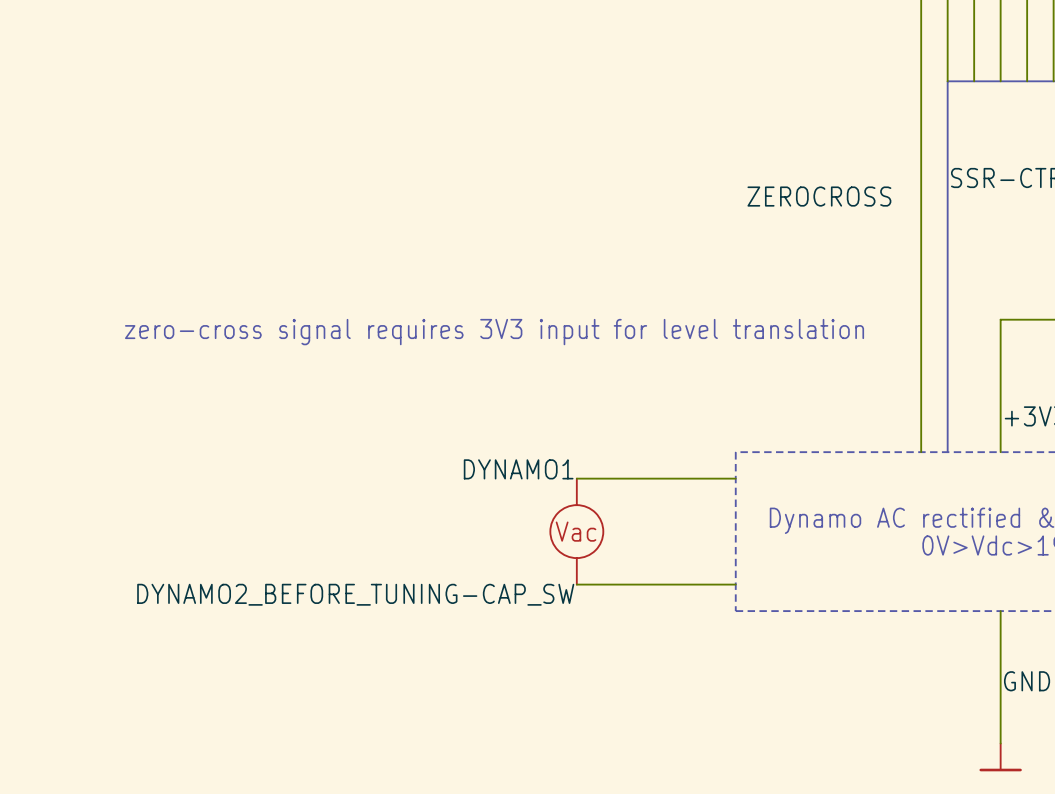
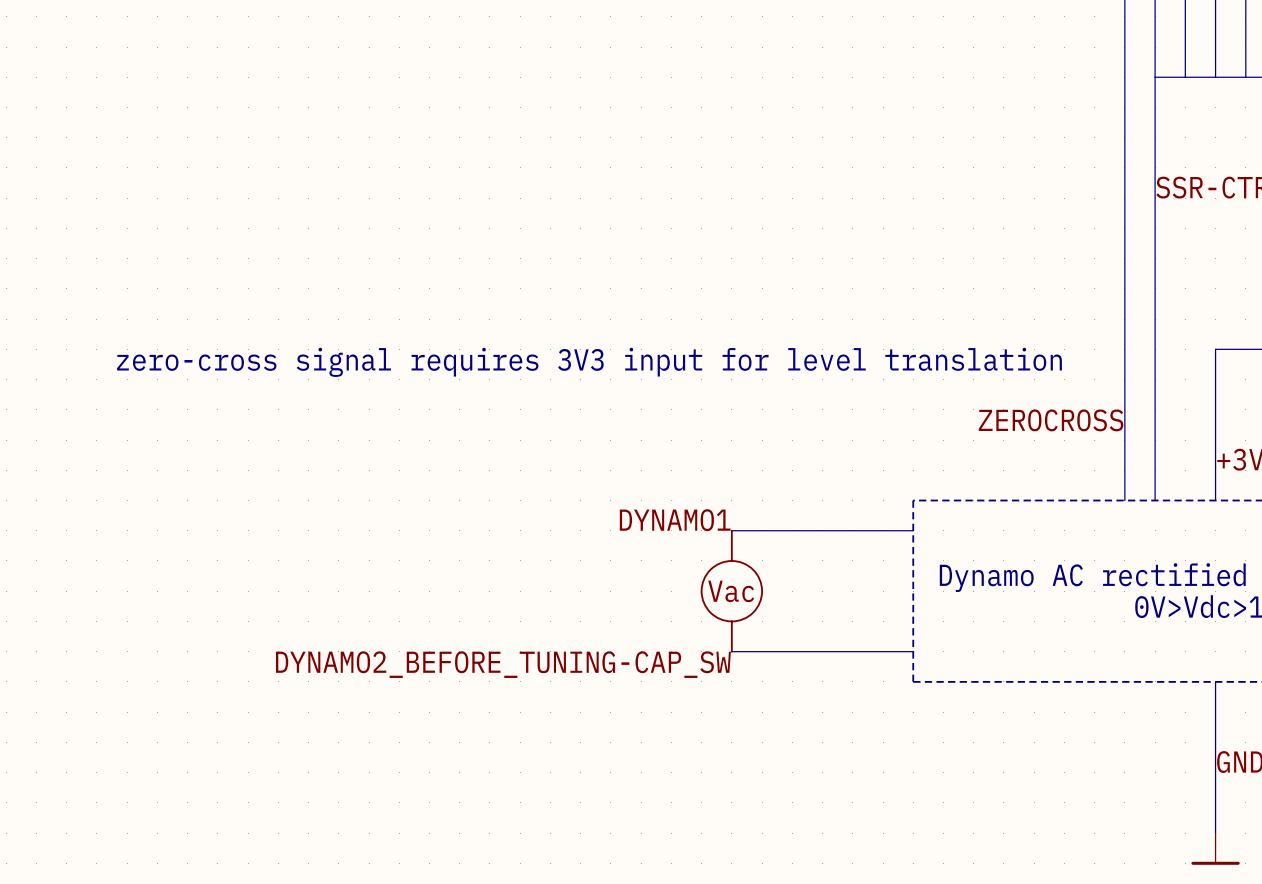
label position: ZEROCROSS (819, 196) -> ZEROCROSS (1051, 420)

